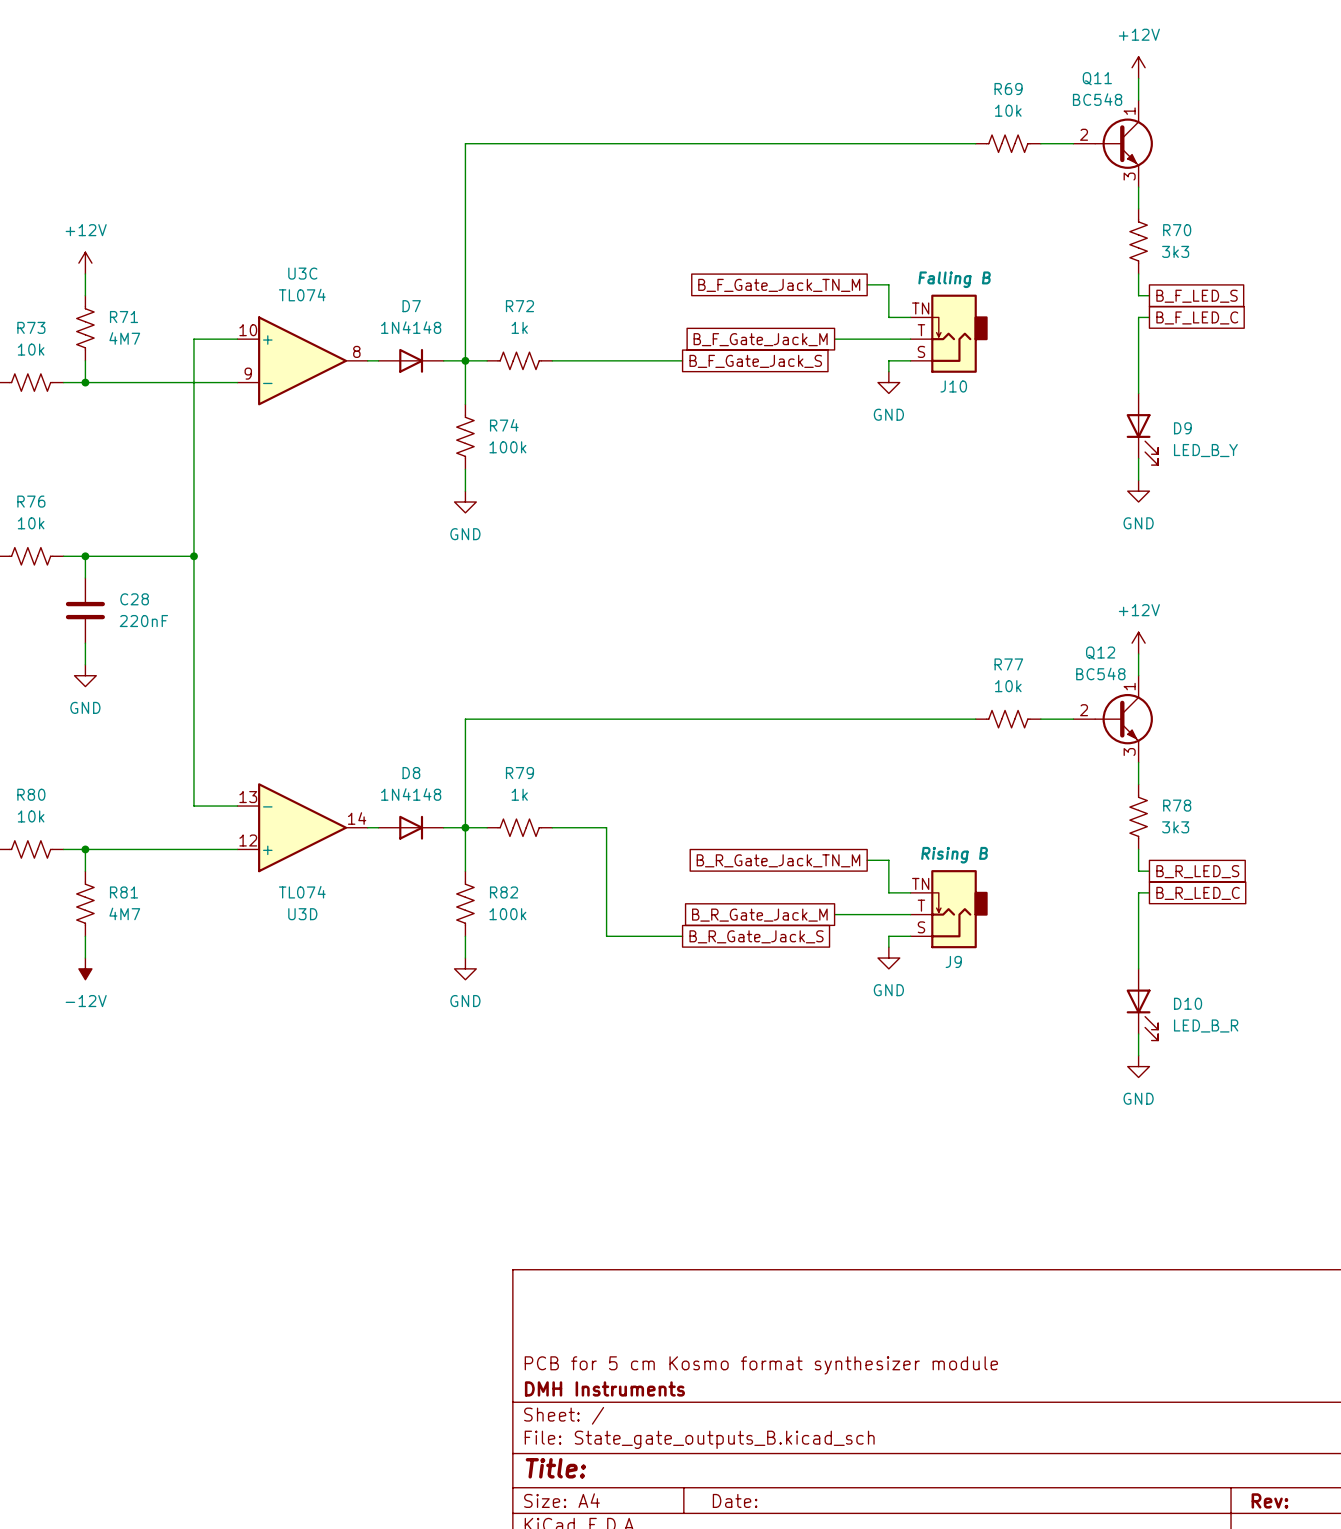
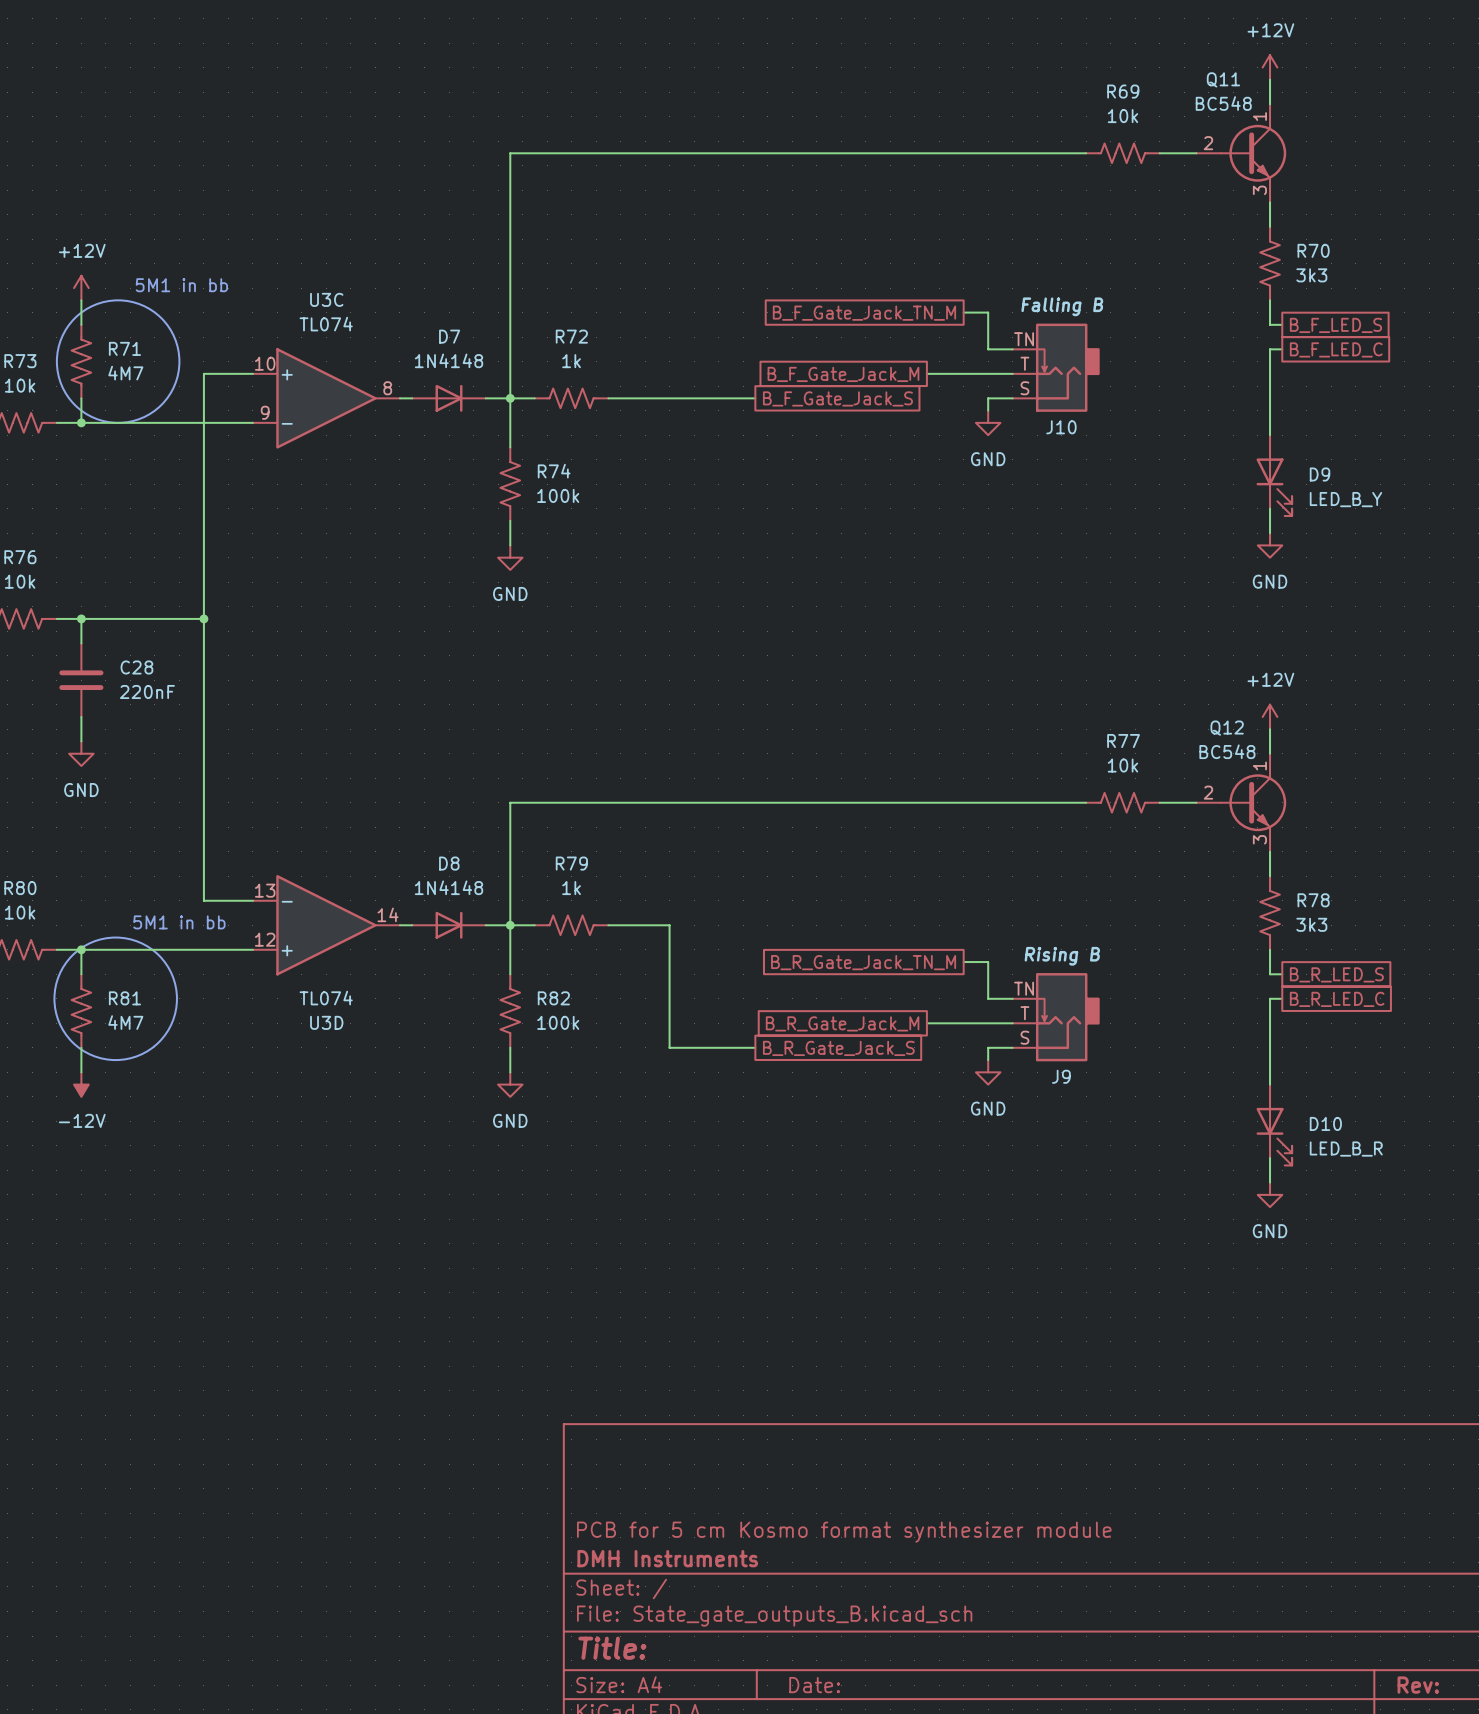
text: none -> 5M1 in bb (181, 285)
drawing: none -> [56, 300, 180, 423]
text: none -> 5M1 in bb (179, 922)
drawing: none -> [54, 937, 177, 1061]

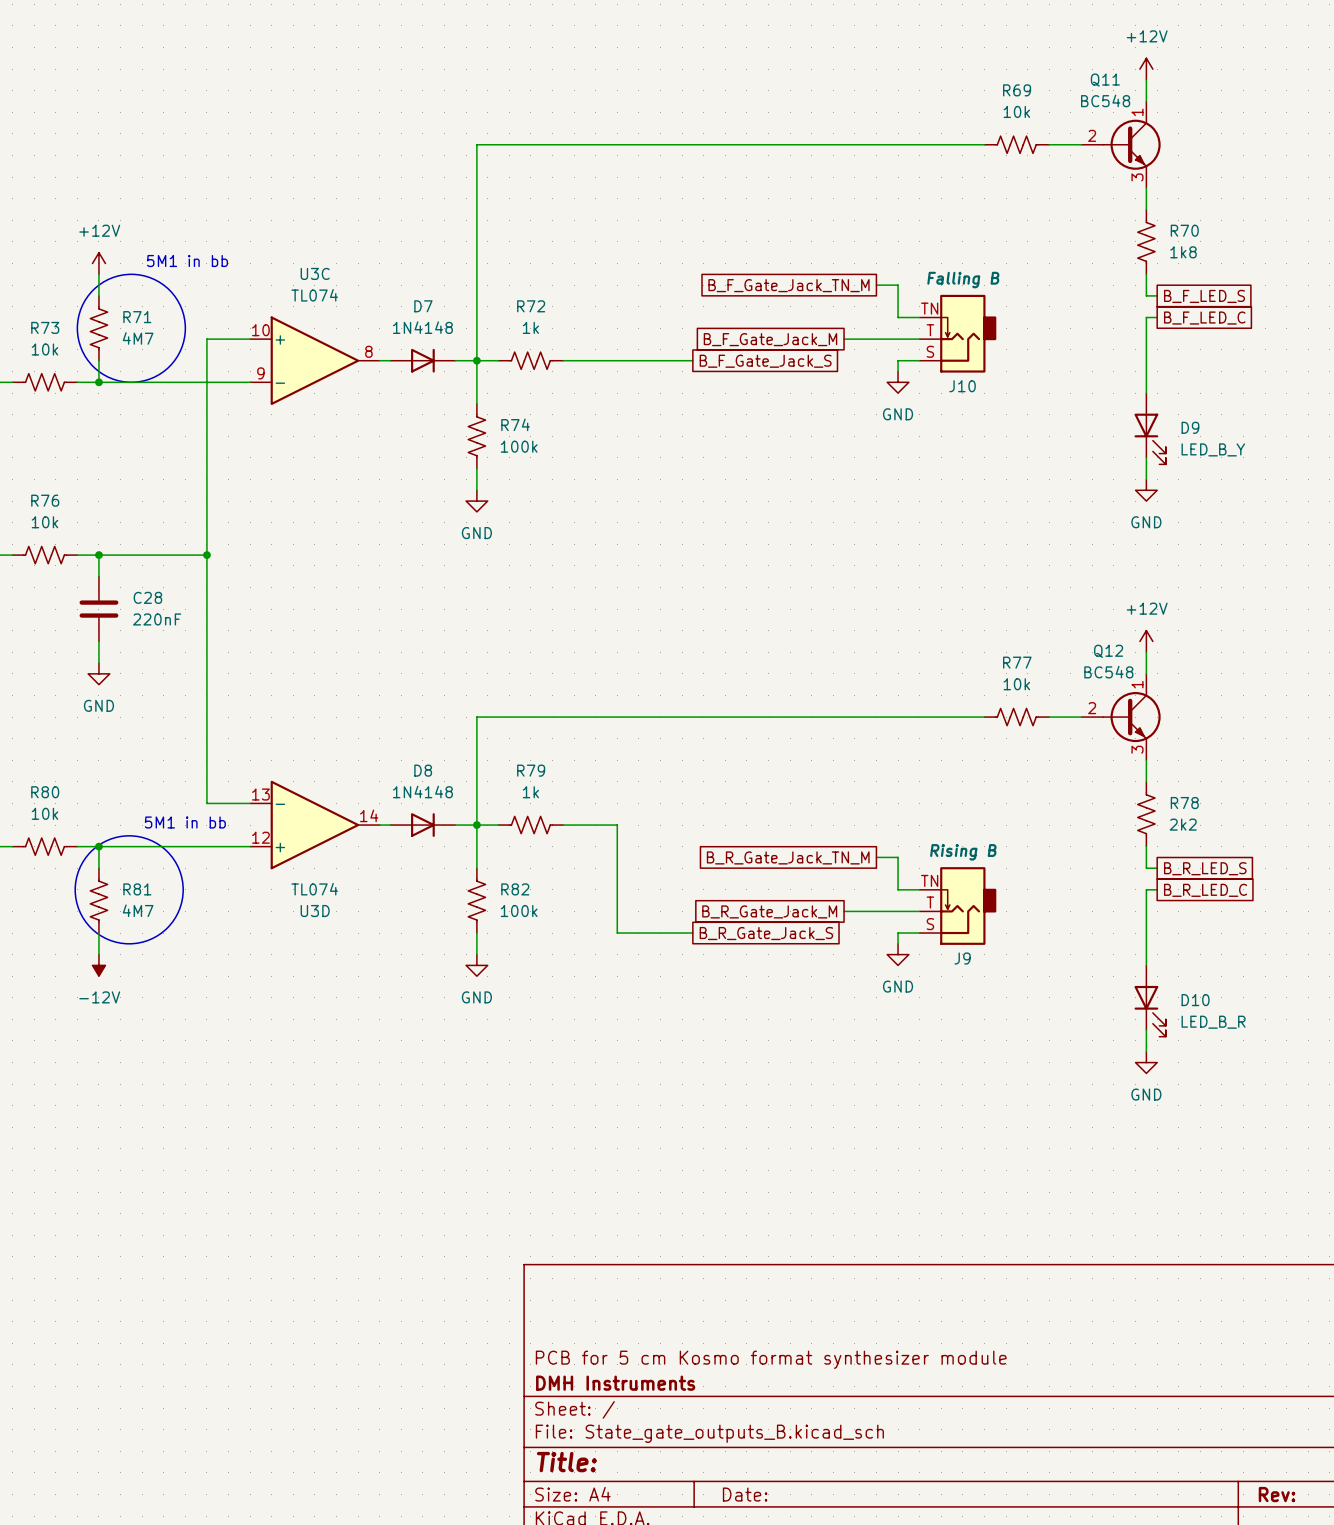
R70 value: 3k3 (1311, 275) -> 1k8 (1183, 252)
R78 value: 3k3 (1311, 924) -> 2k2 (1183, 824)

